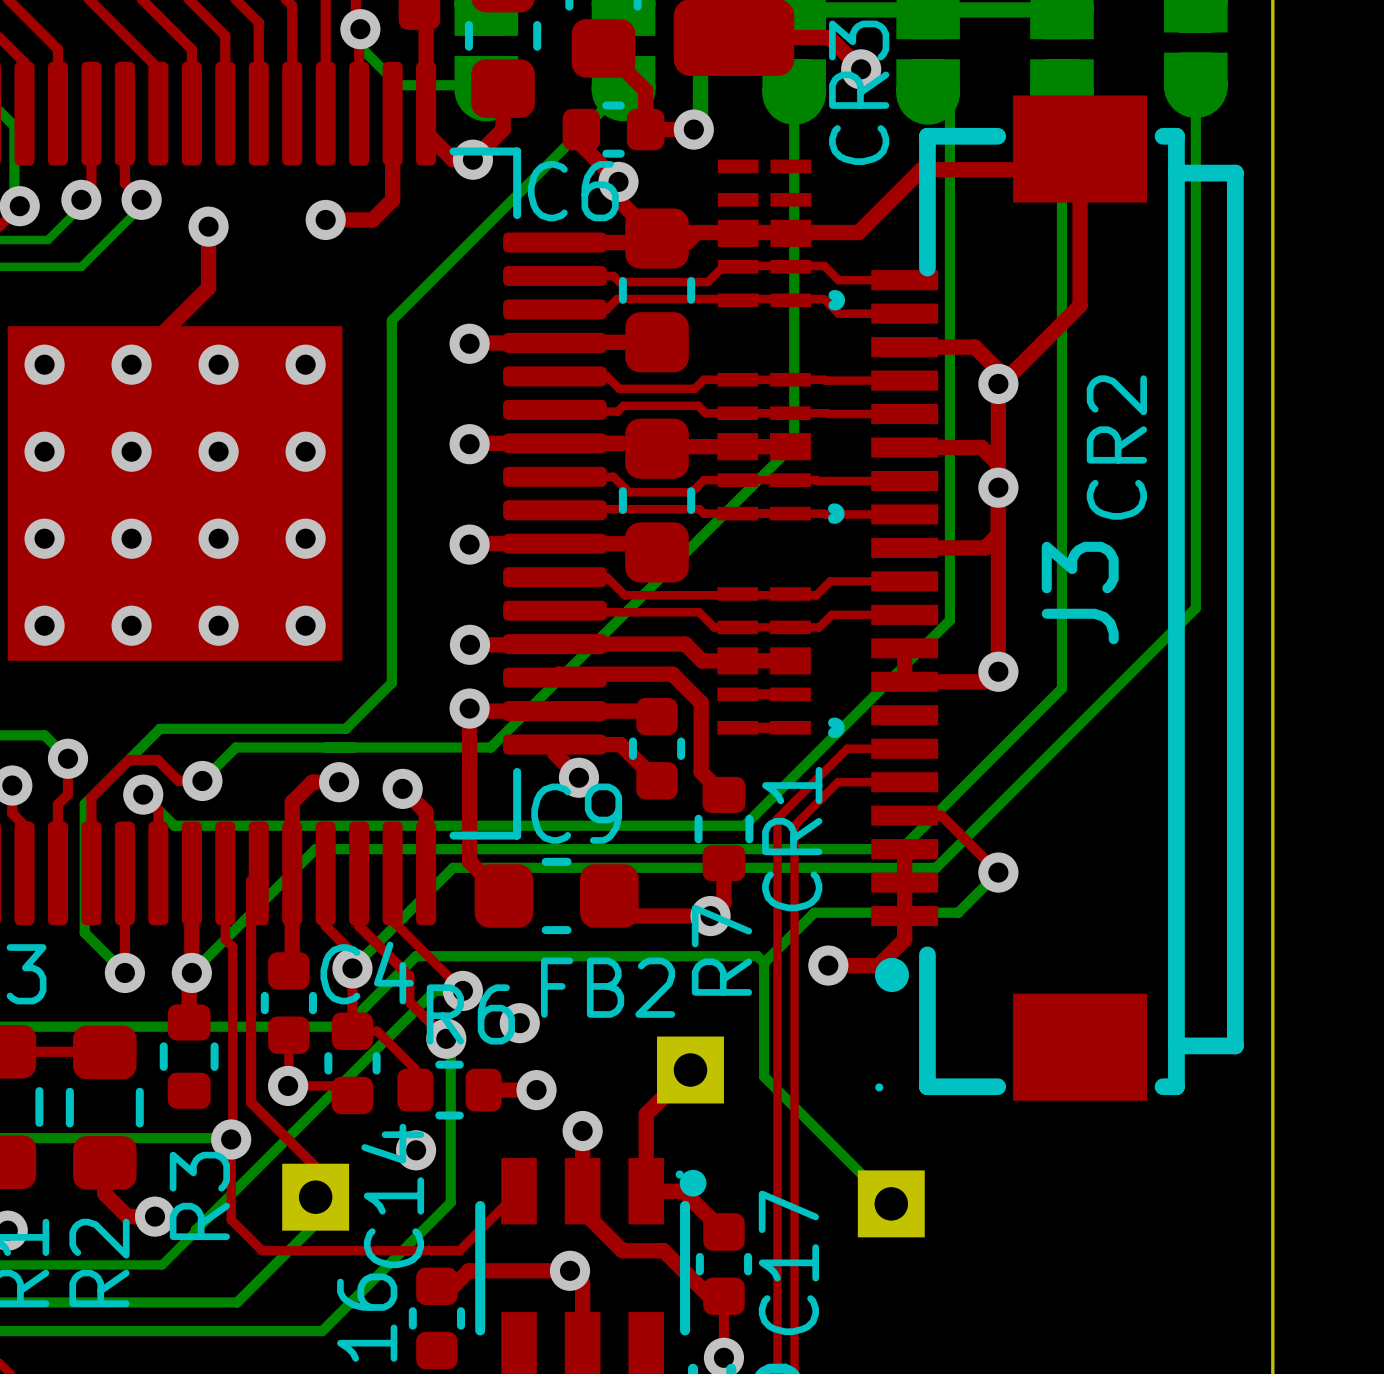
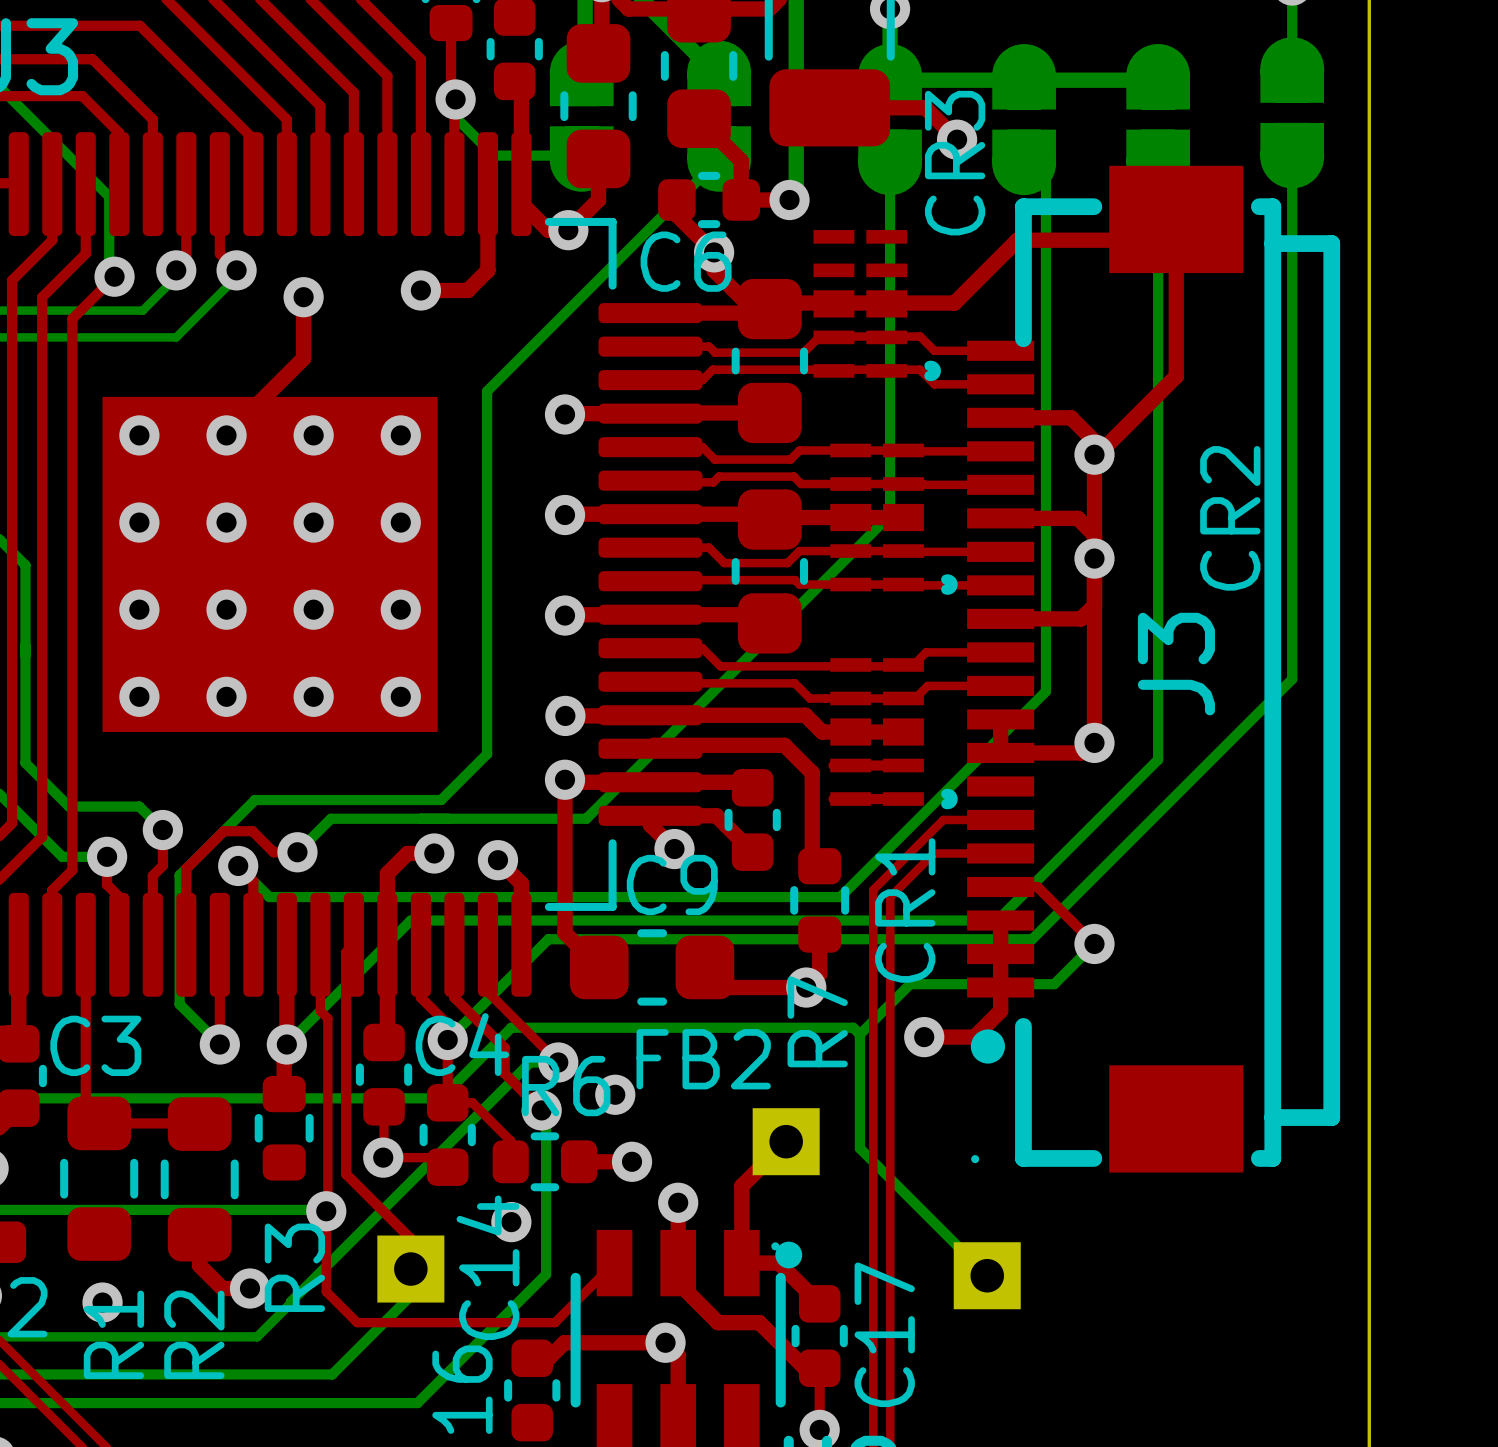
C6 position: (657, 290) -> (769, 361)
CR2 position: (780, 448) -> (893, 519)
part position: (657, 500) -> (769, 571)
top track: (685, 644) (702, 660) (726, 660) -> (781, 715) (805, 715) (822, 732)
CR1 position: (780, 662) -> (893, 733)
top track: (672, 674) (701, 702) (701, 772) (716, 787) -> (768, 745) (784, 745) (812, 773) (812, 858)

